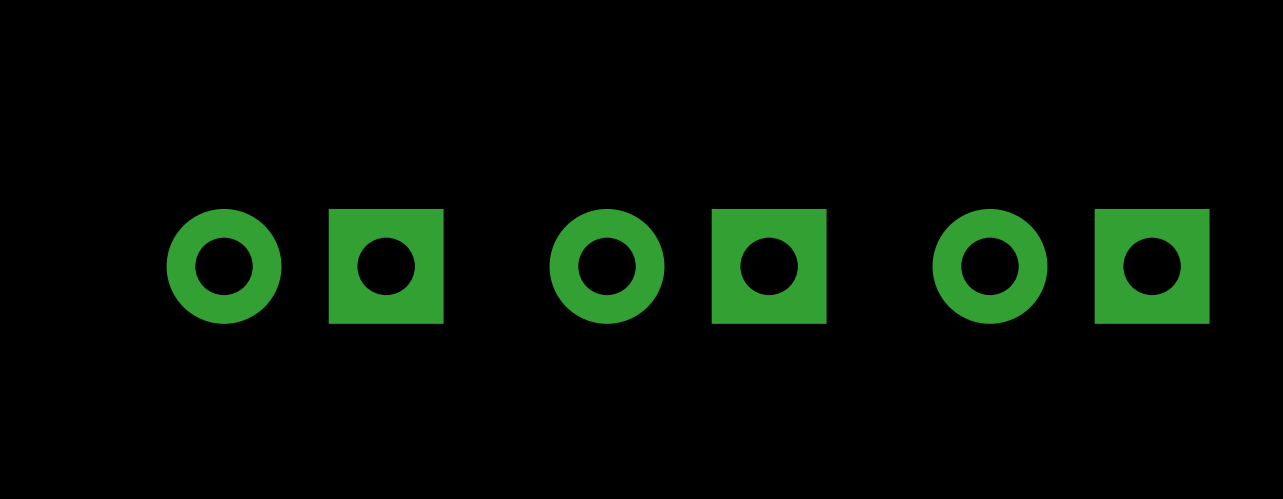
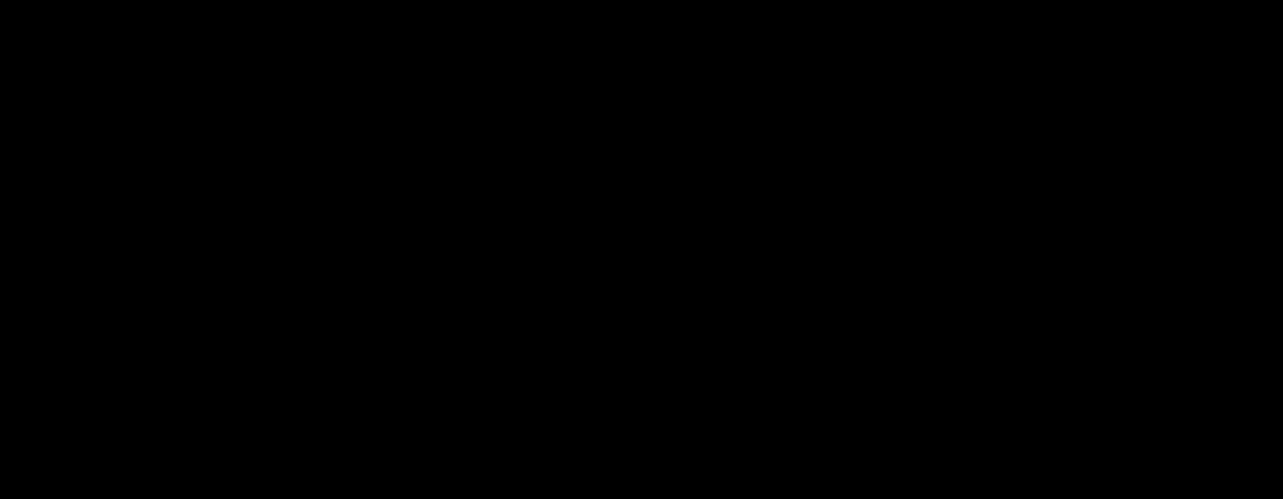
part: (305, 266) -> none
part: (688, 266) -> none
part: (1071, 266) -> none

